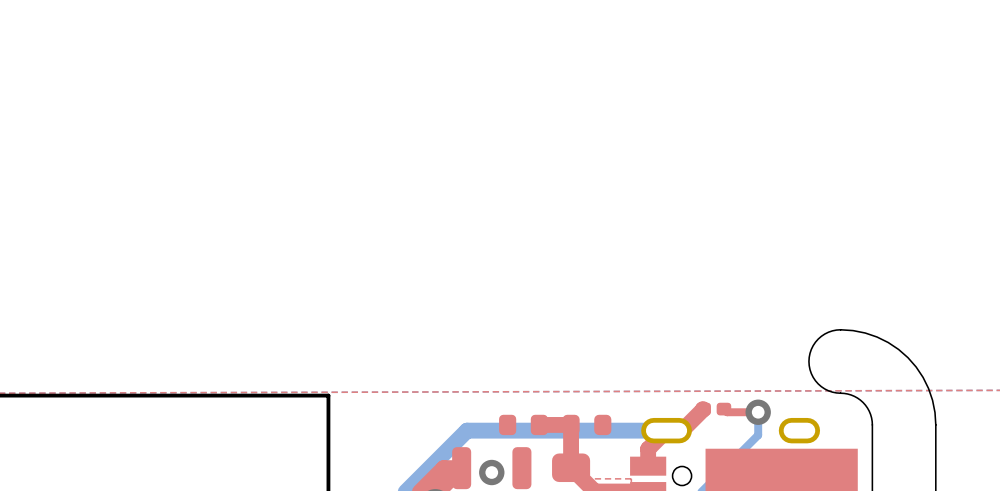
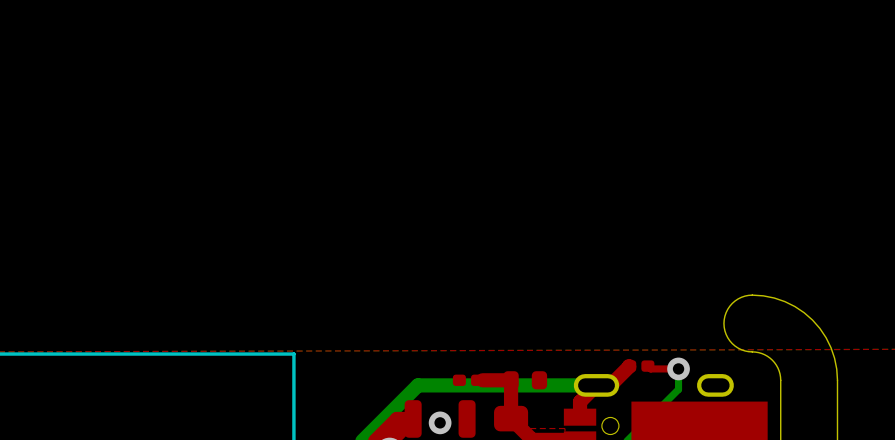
part footprint: [499, 414, 548, 436] -> [452, 374, 485, 386]

